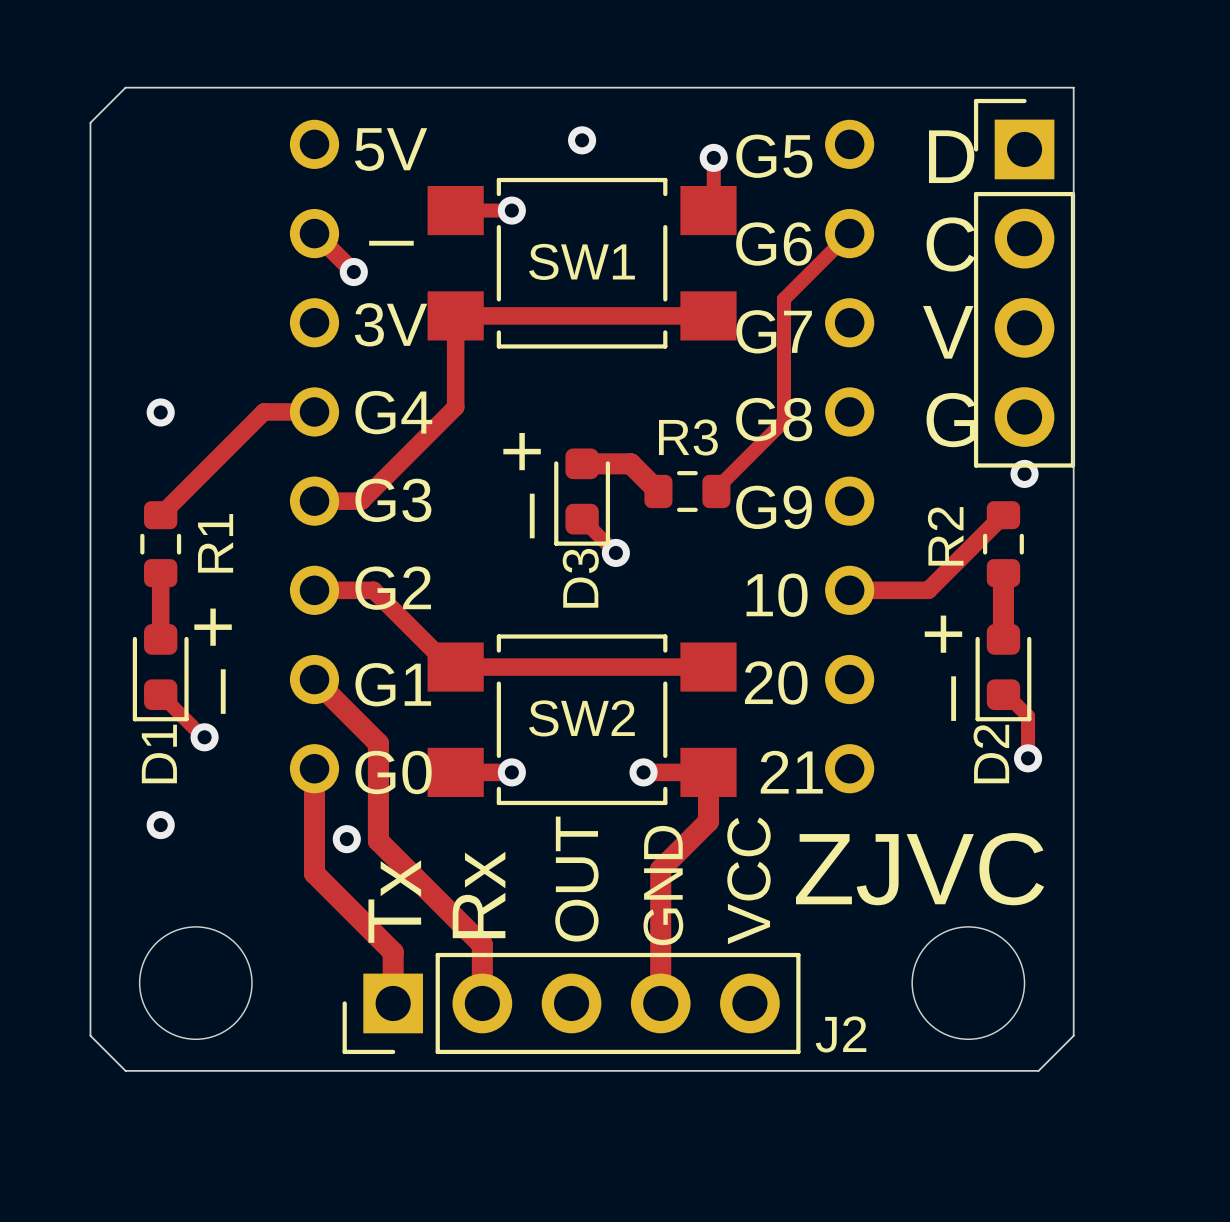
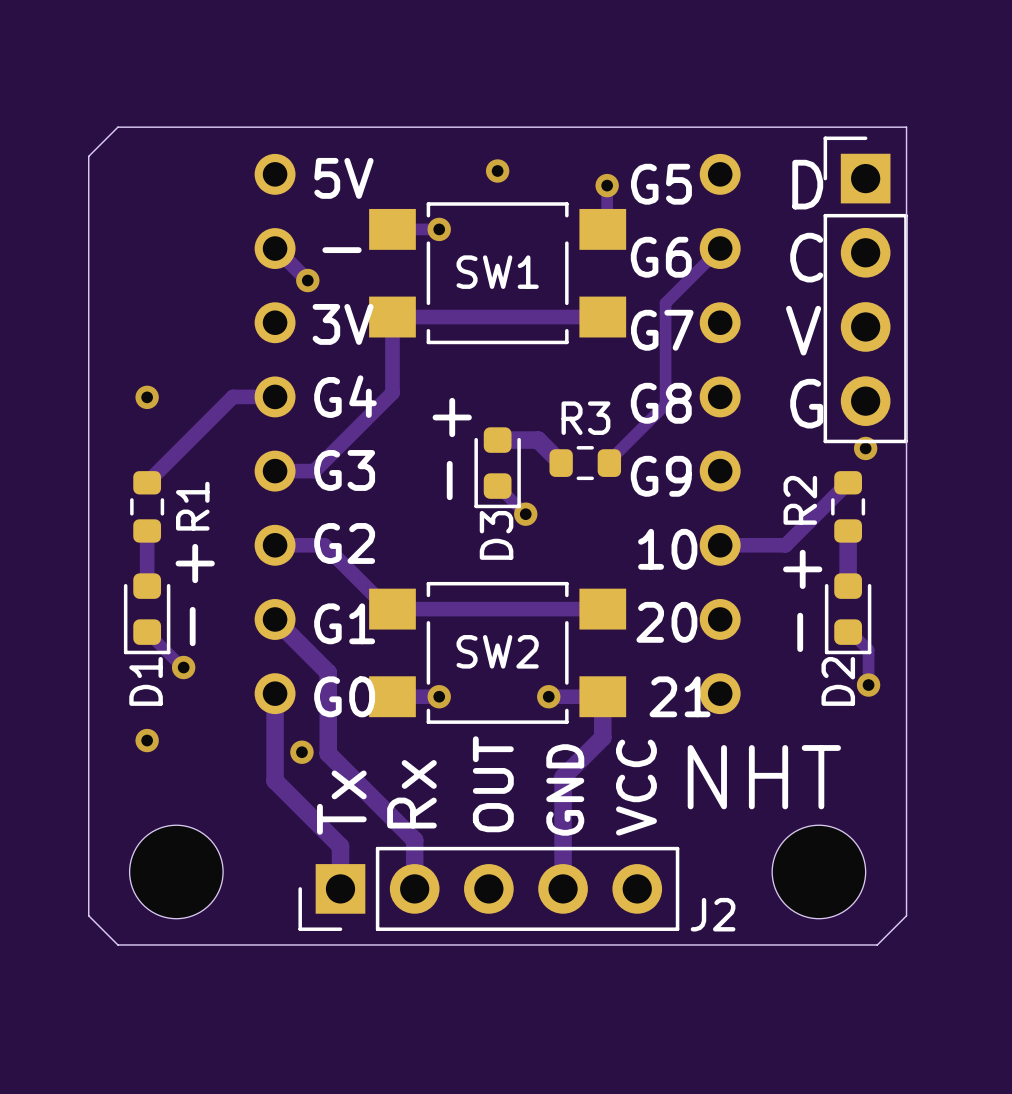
text: ZJVC (920, 869) -> NHT (764, 777)

